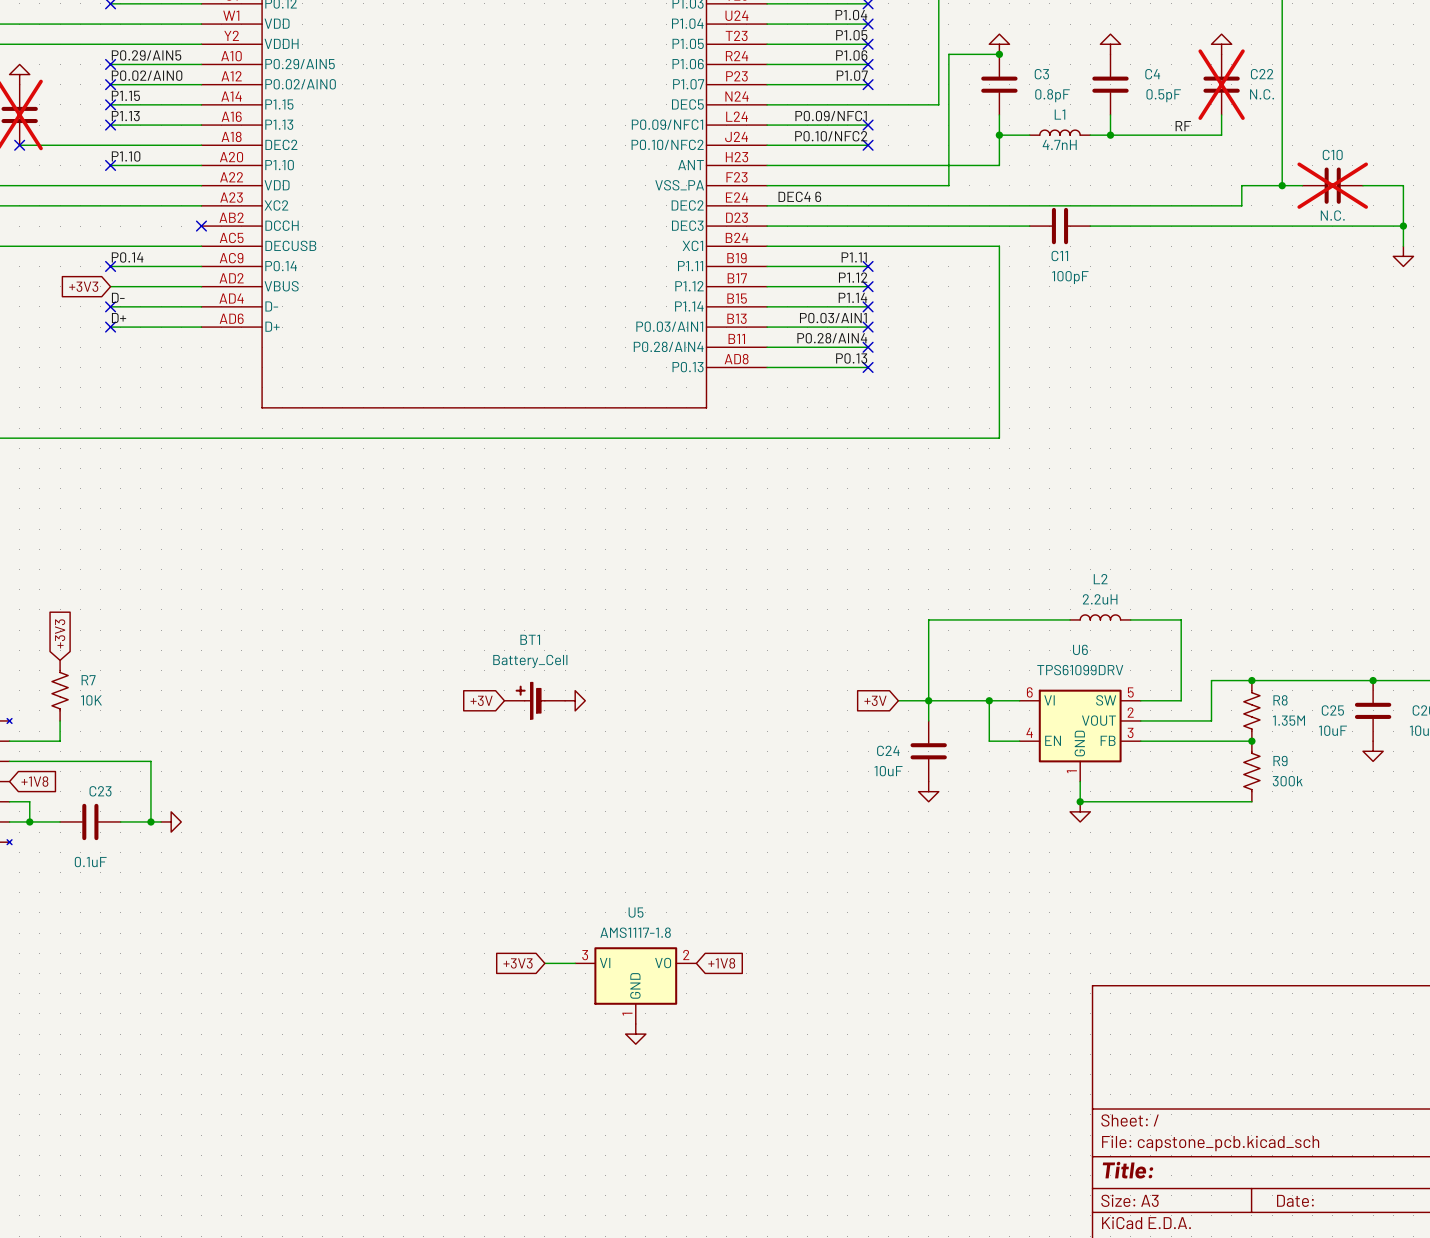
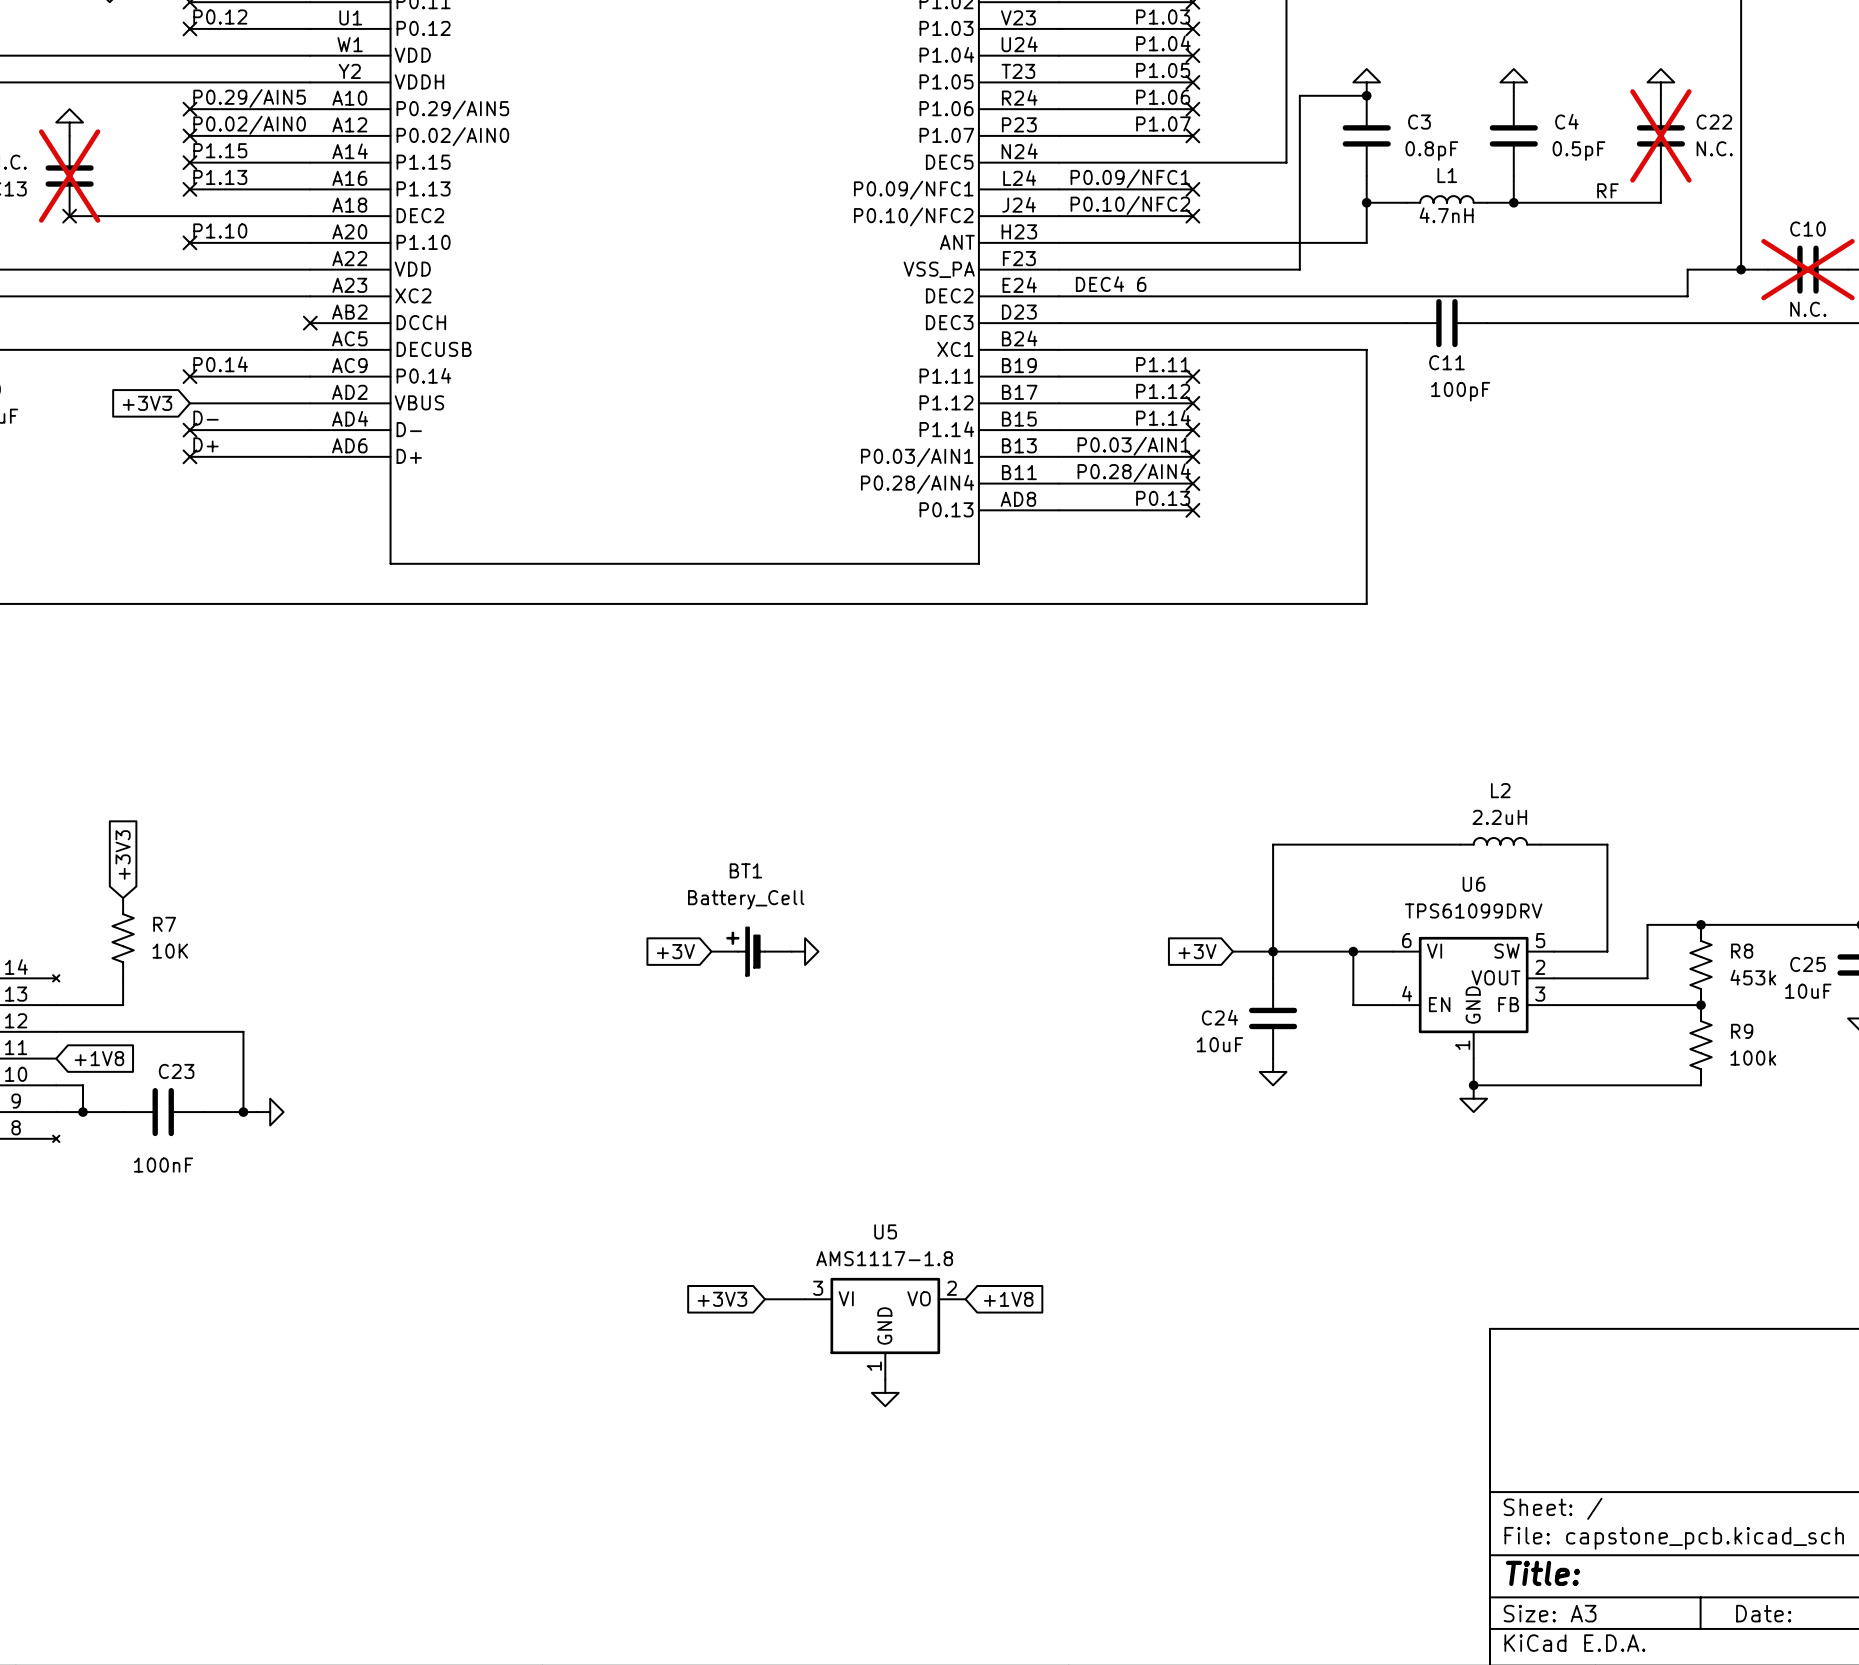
R8 value: 1.35M (1288, 720) -> 453k (1753, 977)
R9 value: 300k (1287, 781) -> 100k (1753, 1058)
C23 value: 0.1uF (90, 862) -> 100nF (163, 1165)

